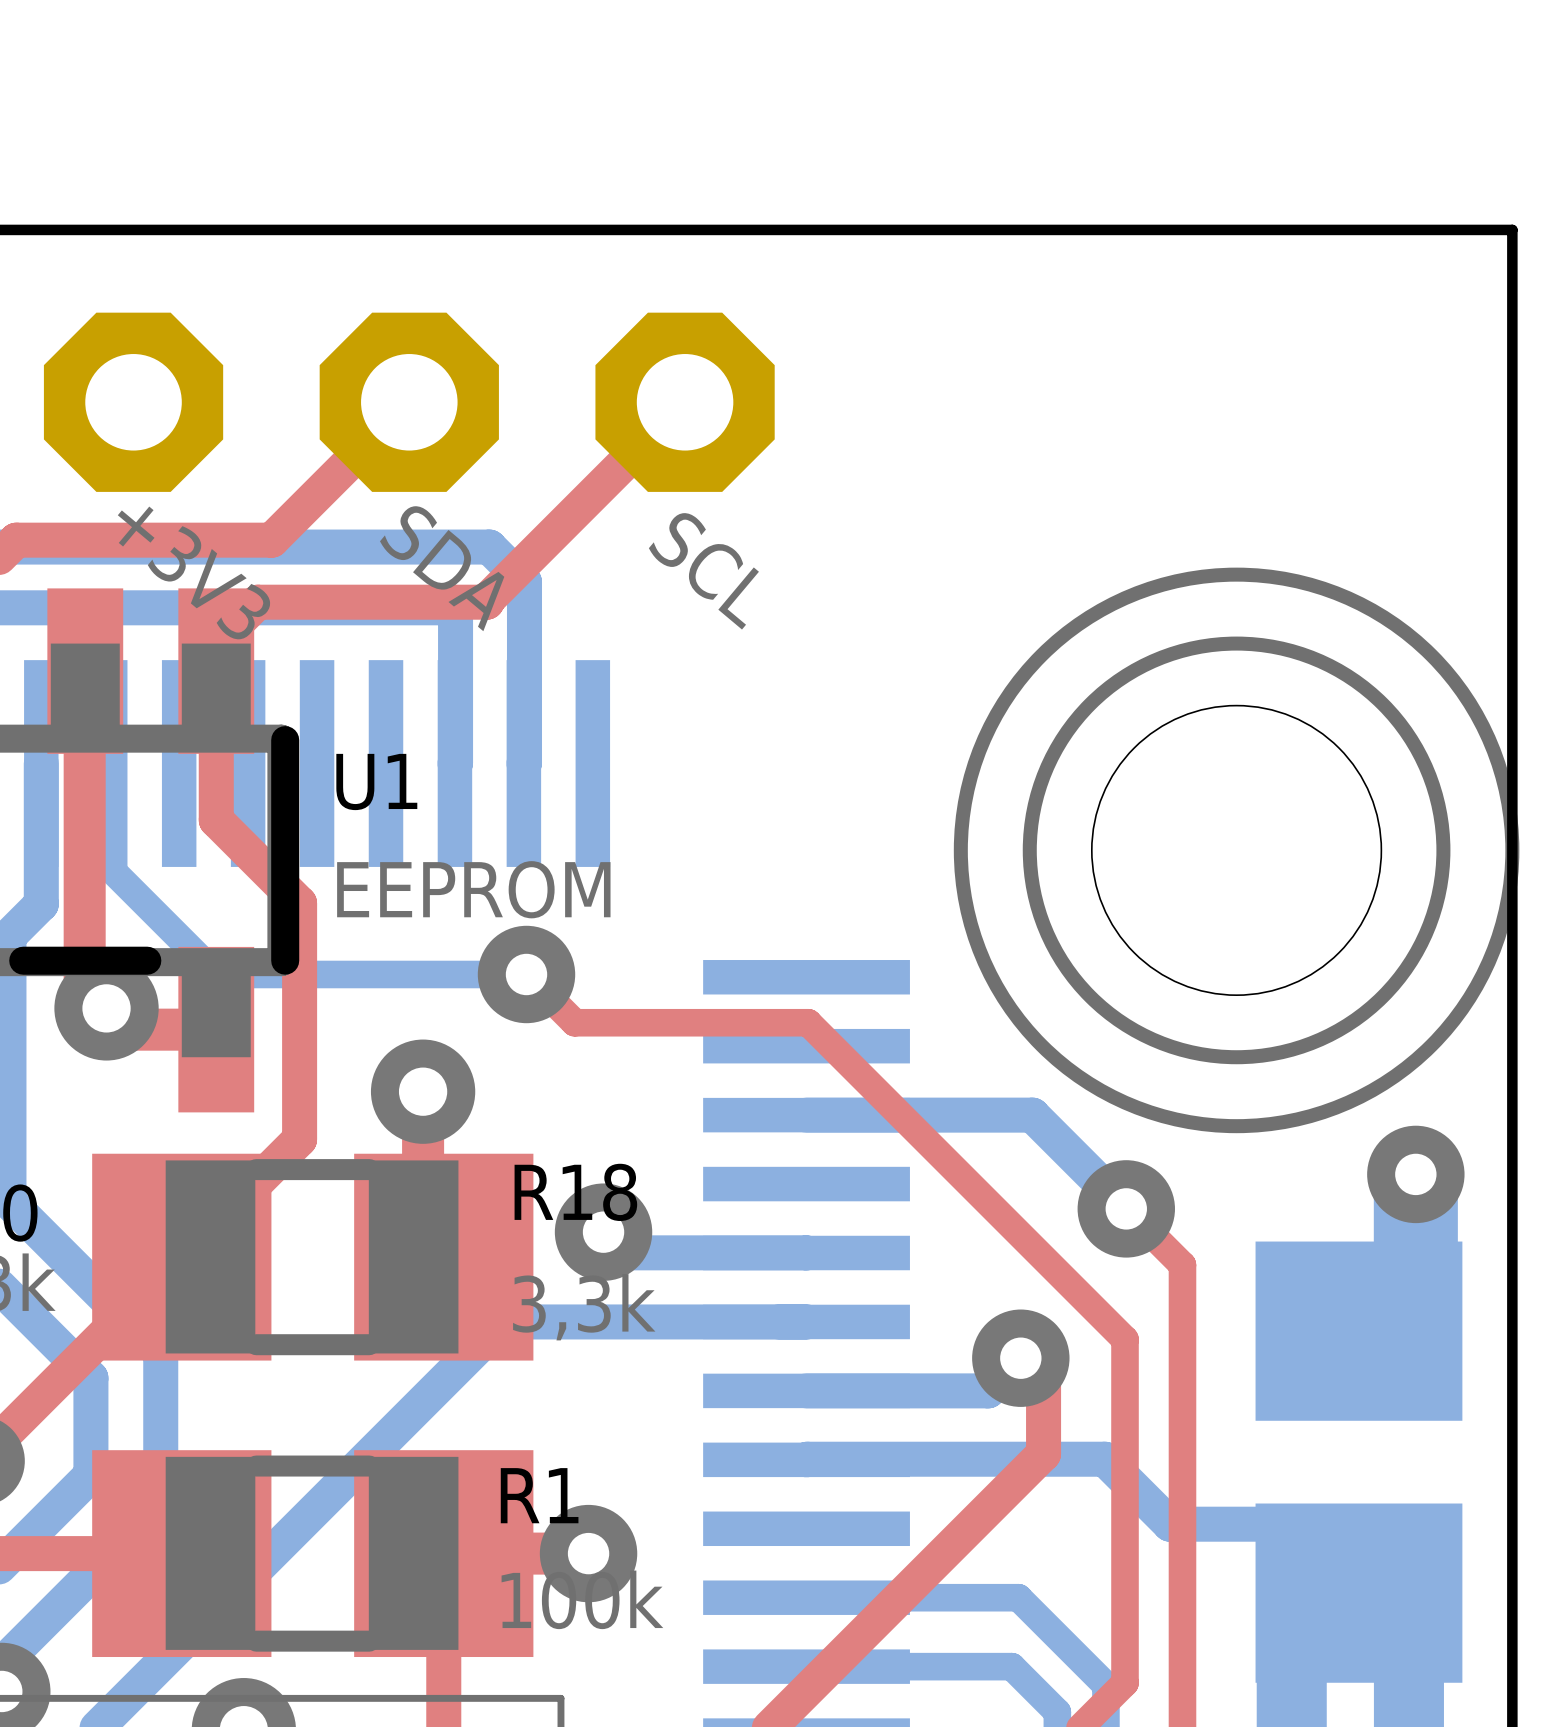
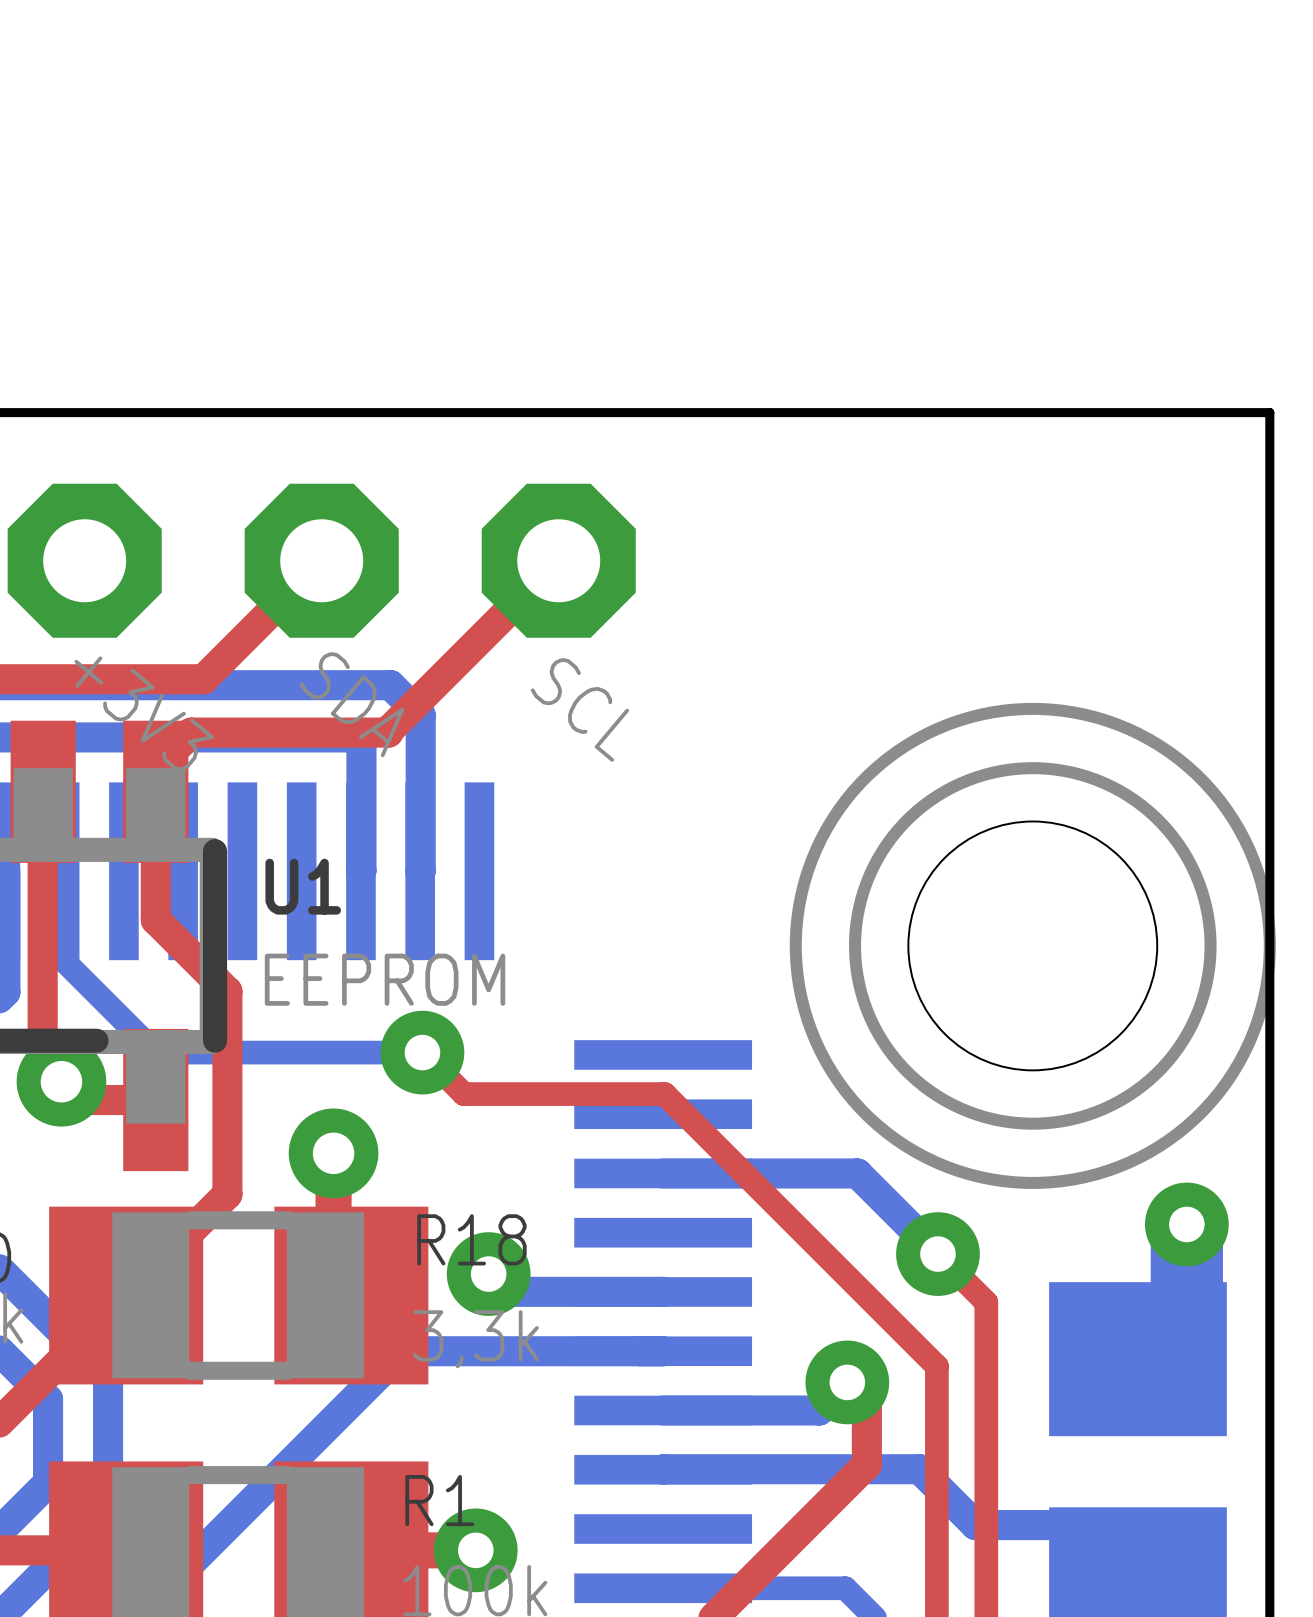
top track width: thick (84, 671) (84, 986) (127, 1029) (216, 1029) -> thin (42, 792) (42, 1062) (79, 1100) (155, 1100)

